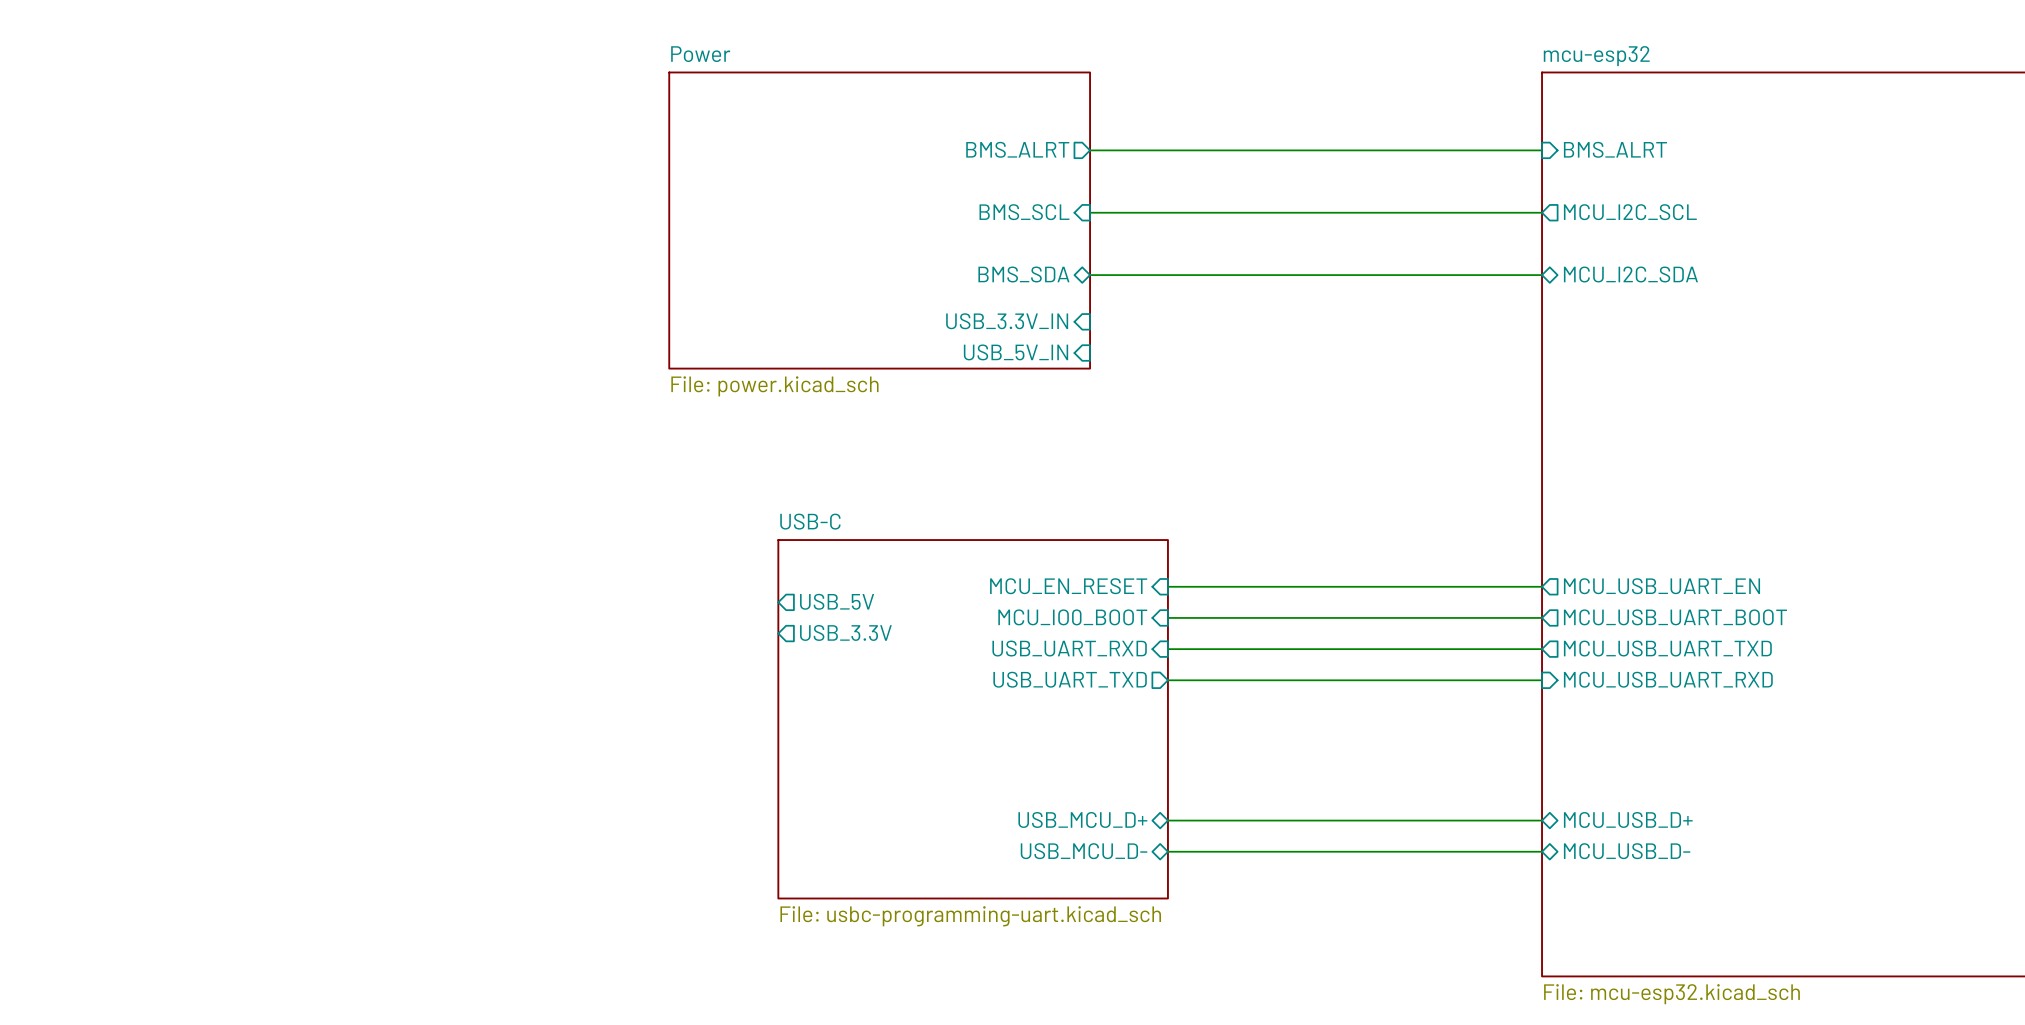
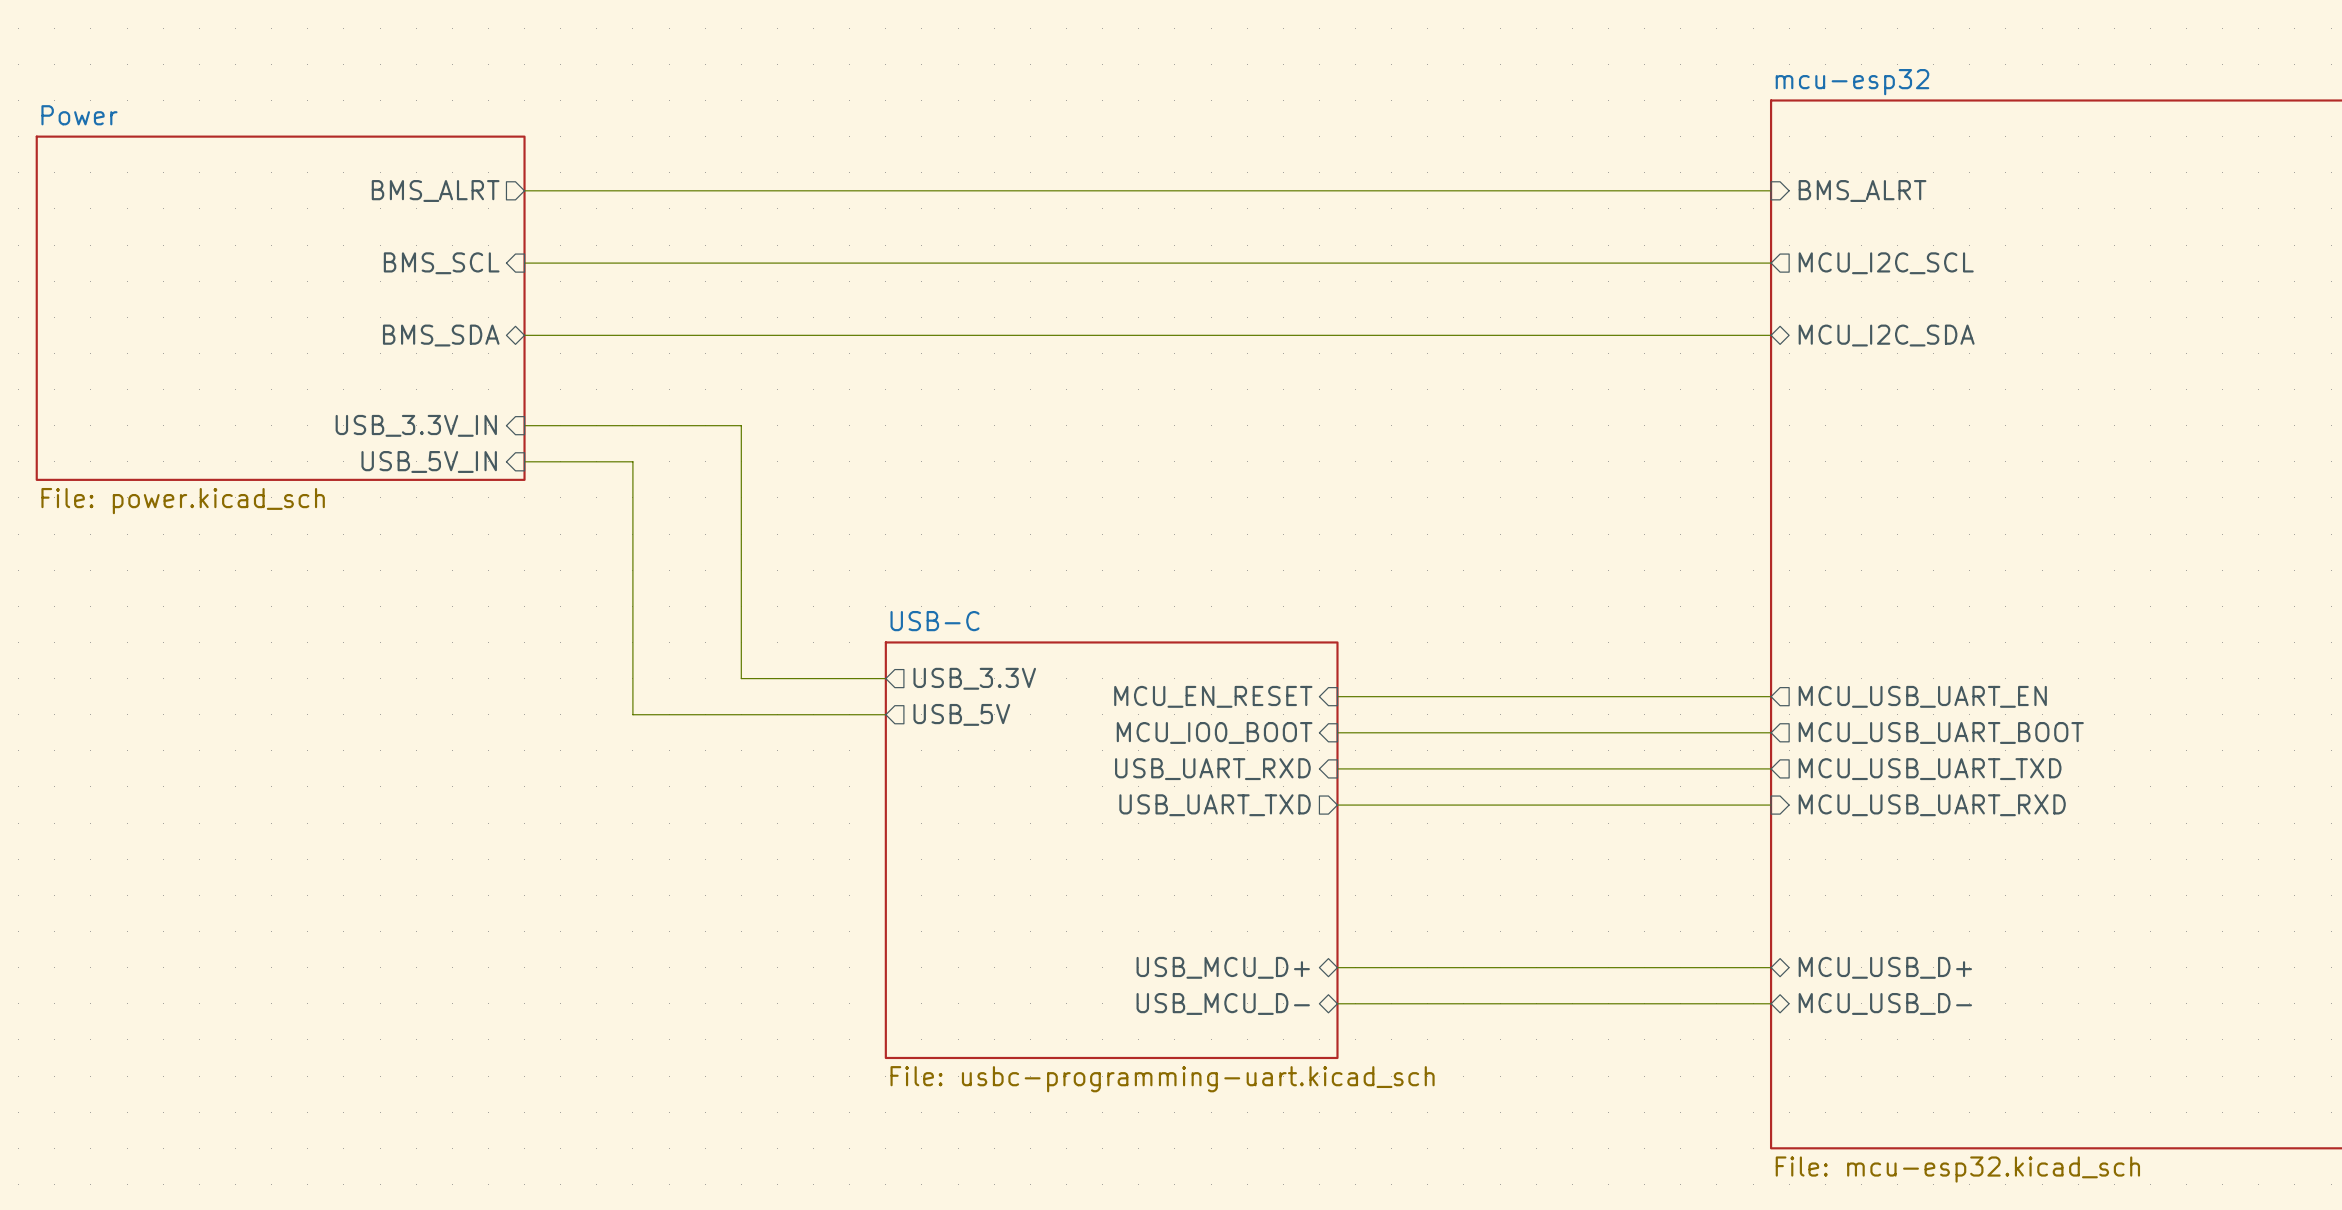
sheet pin: none -> BMS_ALRT (435, 191)
sheet pin: BMS_ALRT (1017, 149) -> none
wire: none -> (524, 190) (1247, 190)
sheet pin: none -> BMS_SCL (441, 263)
wire: none -> (524, 263) (1247, 263)
sheet pin: BMS_SCL (1024, 212) -> none
sheet Power: File: power.kicad_sch (879, 220) -> none
sheet Power: none -> File: power.kicad_sch (280, 308)
sheet pin: none -> BMS_SDA (441, 335)
sheet pin: BMS_SDA (1023, 274) -> none
wire: none -> (524, 335) (1247, 335)
sheet pin: USB_3.3V_IN (1007, 321) -> none
sheet pin: none -> USB_3.3V_IN (416, 425)
sheet pin: USB_5V_IN (1016, 352) -> none
wire: none -> (524, 425) (741, 425) (741, 678) (885, 678)
sheet pin: none -> USB_5V_IN (429, 461)
wire: none -> (524, 461) (632, 461) (632, 714) (885, 714)
sheet pin position: USB_3.3V (845, 632) -> USB_3.3V (974, 678)

